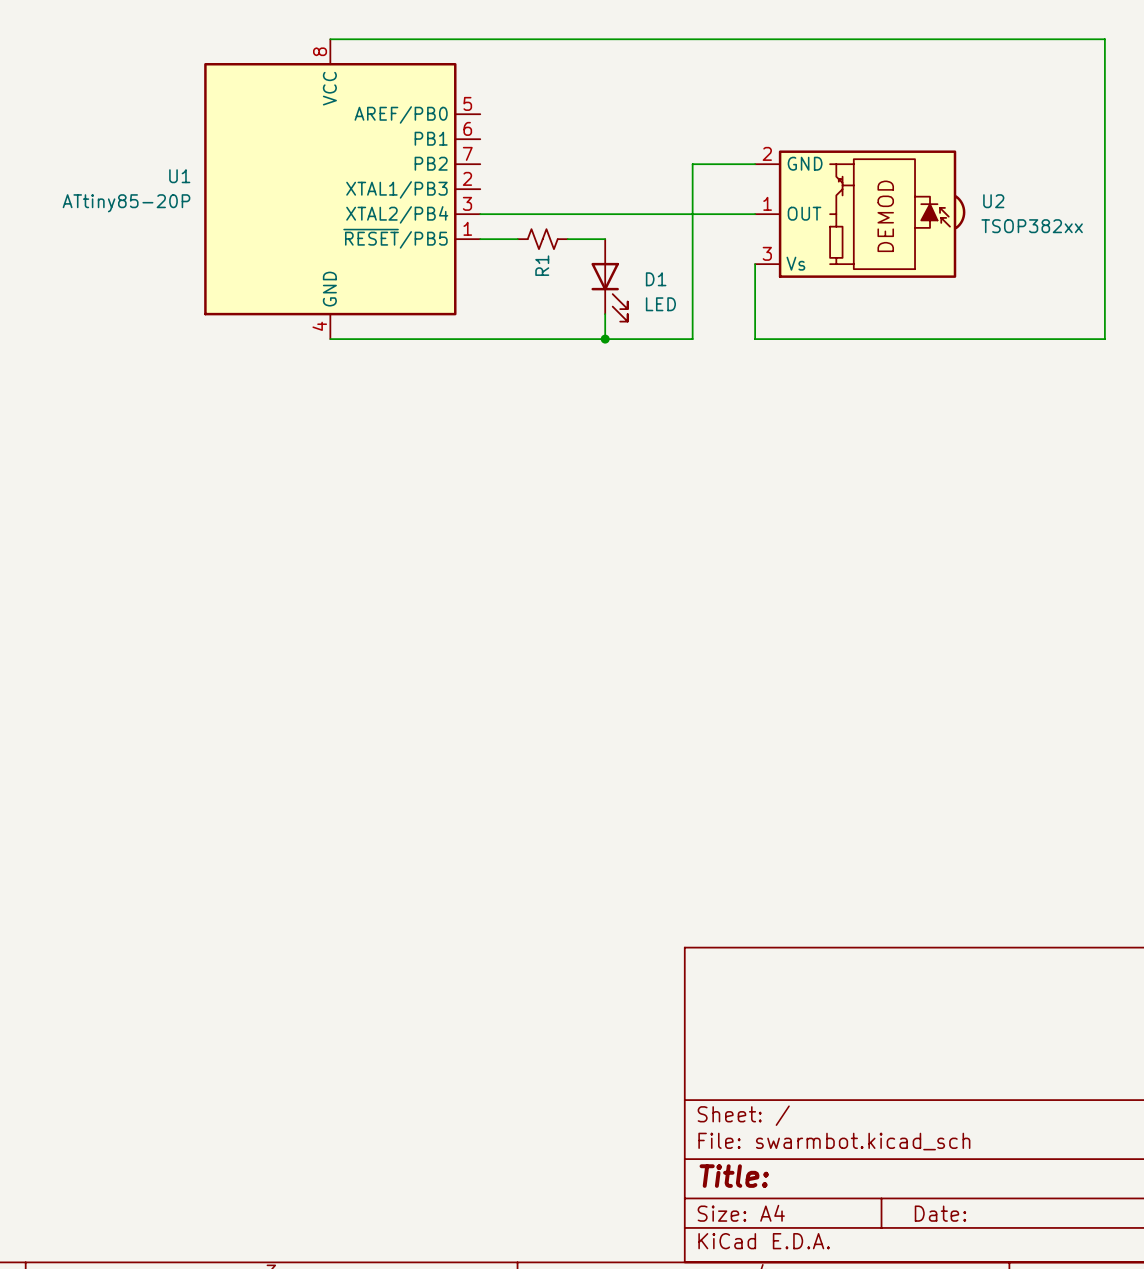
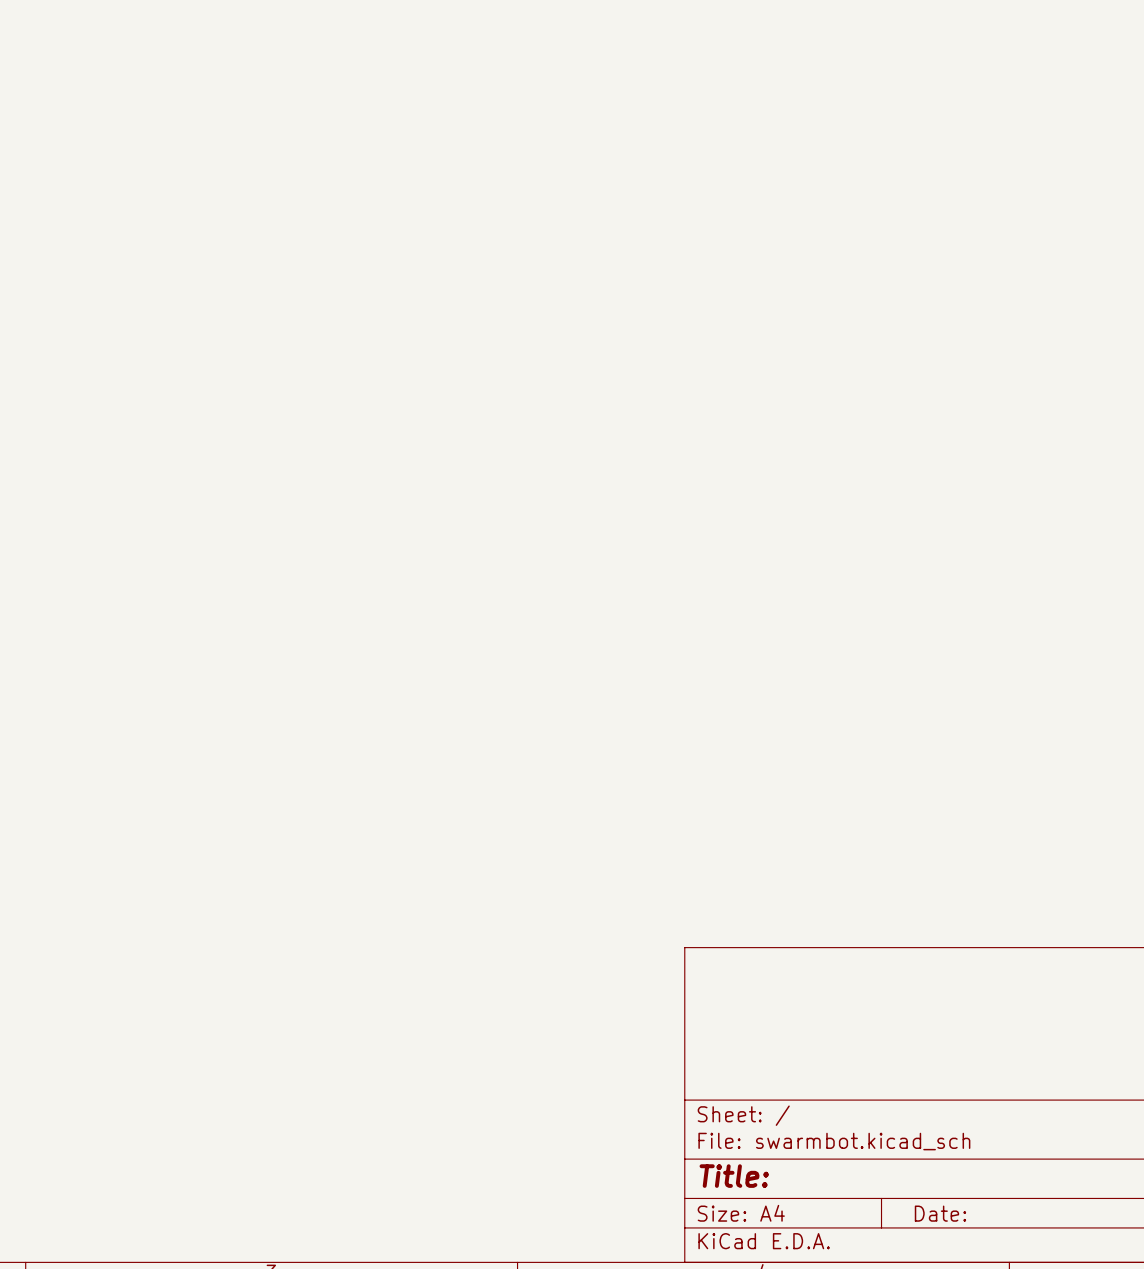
wire: (330, 39) (1104, 39) (1104, 339) (755, 339) (755, 264) -> none
wire: (755, 164) (692, 164) (692, 339) (330, 339) -> none
U1: ATtiny85-20P (342, 189) -> none
wire: (480, 214) (755, 214) -> none
U2: TSOP382xx (860, 214) -> none
wire: (480, 239) (517, 239) -> none
R1: (542, 239) -> none
wire: (567, 239) (605, 239) -> none
D1: LED (609, 280) -> none
wire: (605, 314) (605, 339) -> none
junction: (605, 339) -> none

